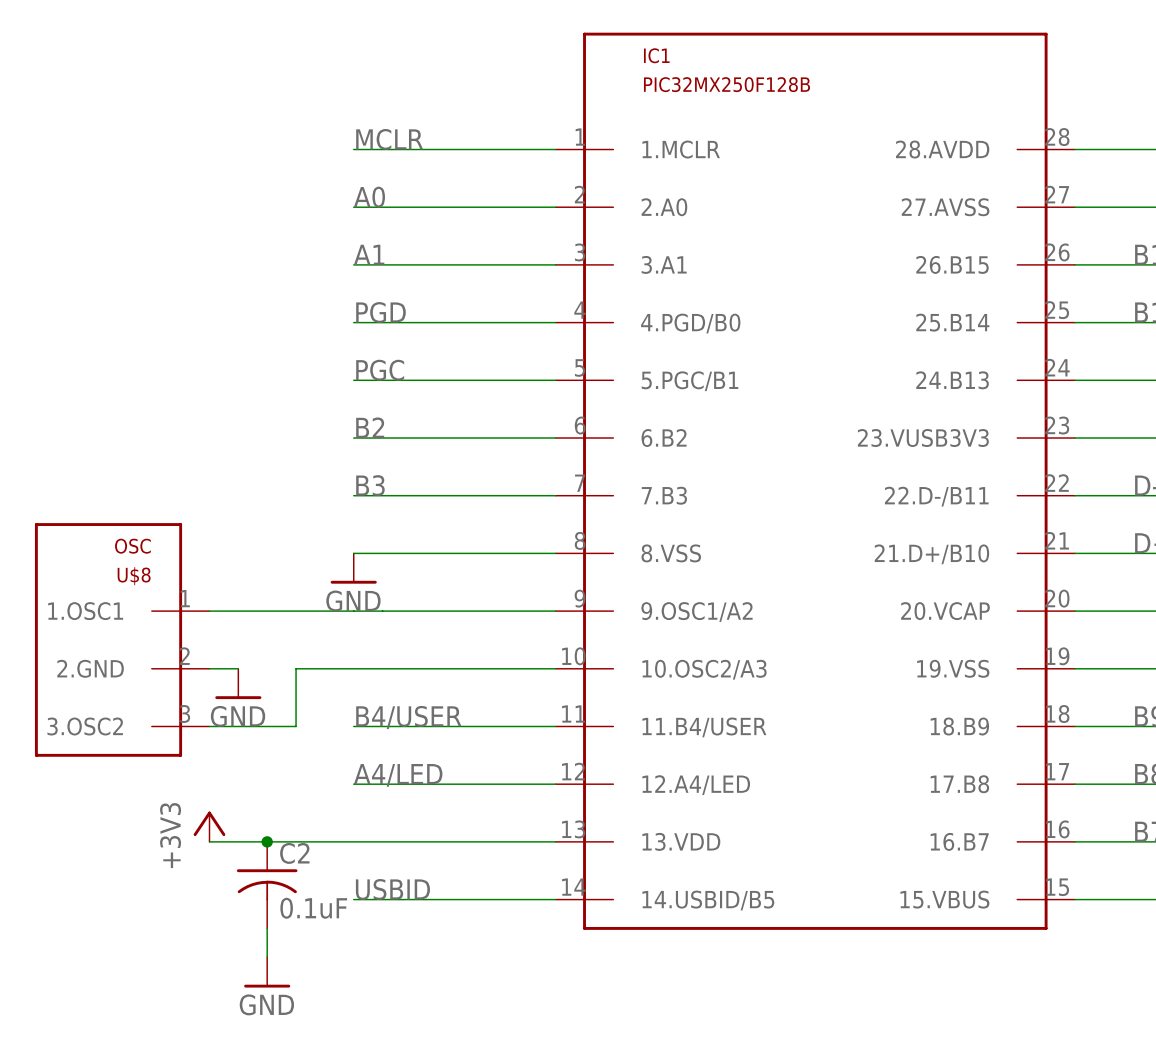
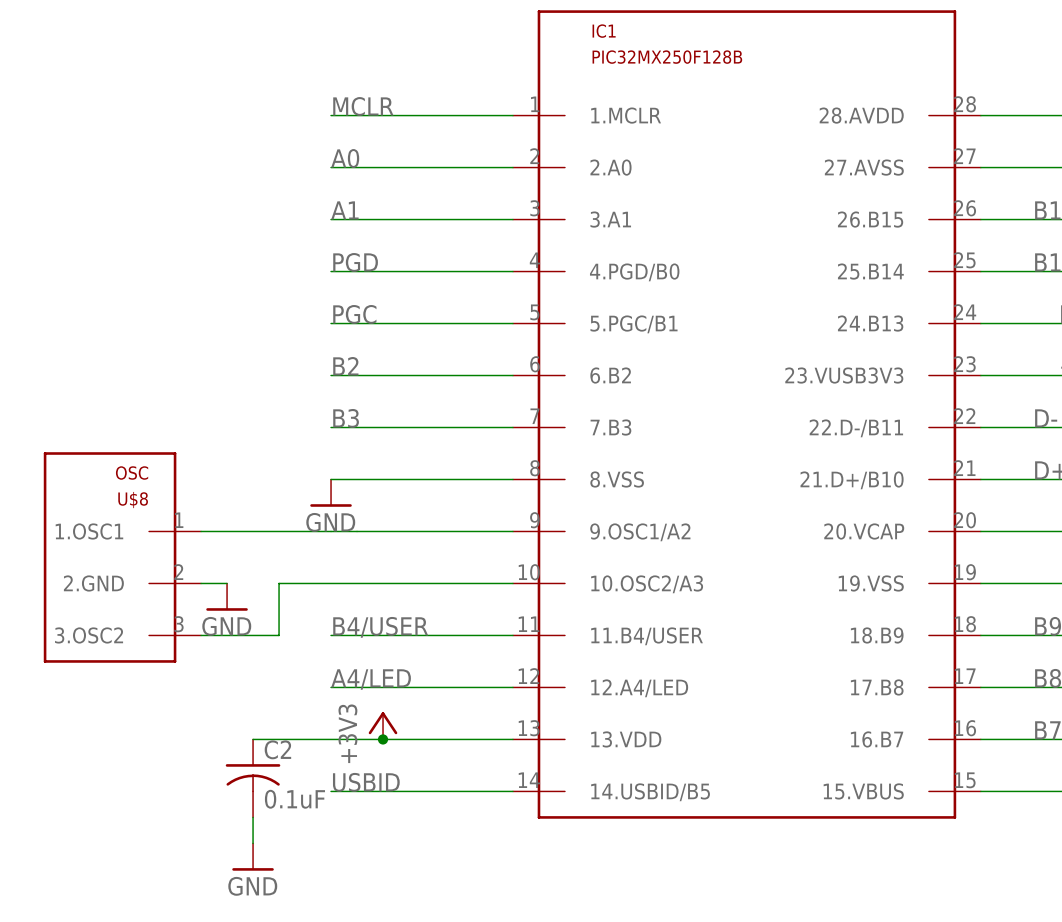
power symbol position: +3V3 (209, 826) -> +3V3 (383, 725)
wire: (209, 841) (267, 841) -> none
junction: (267, 841) -> none
junction: none -> (383, 739)

